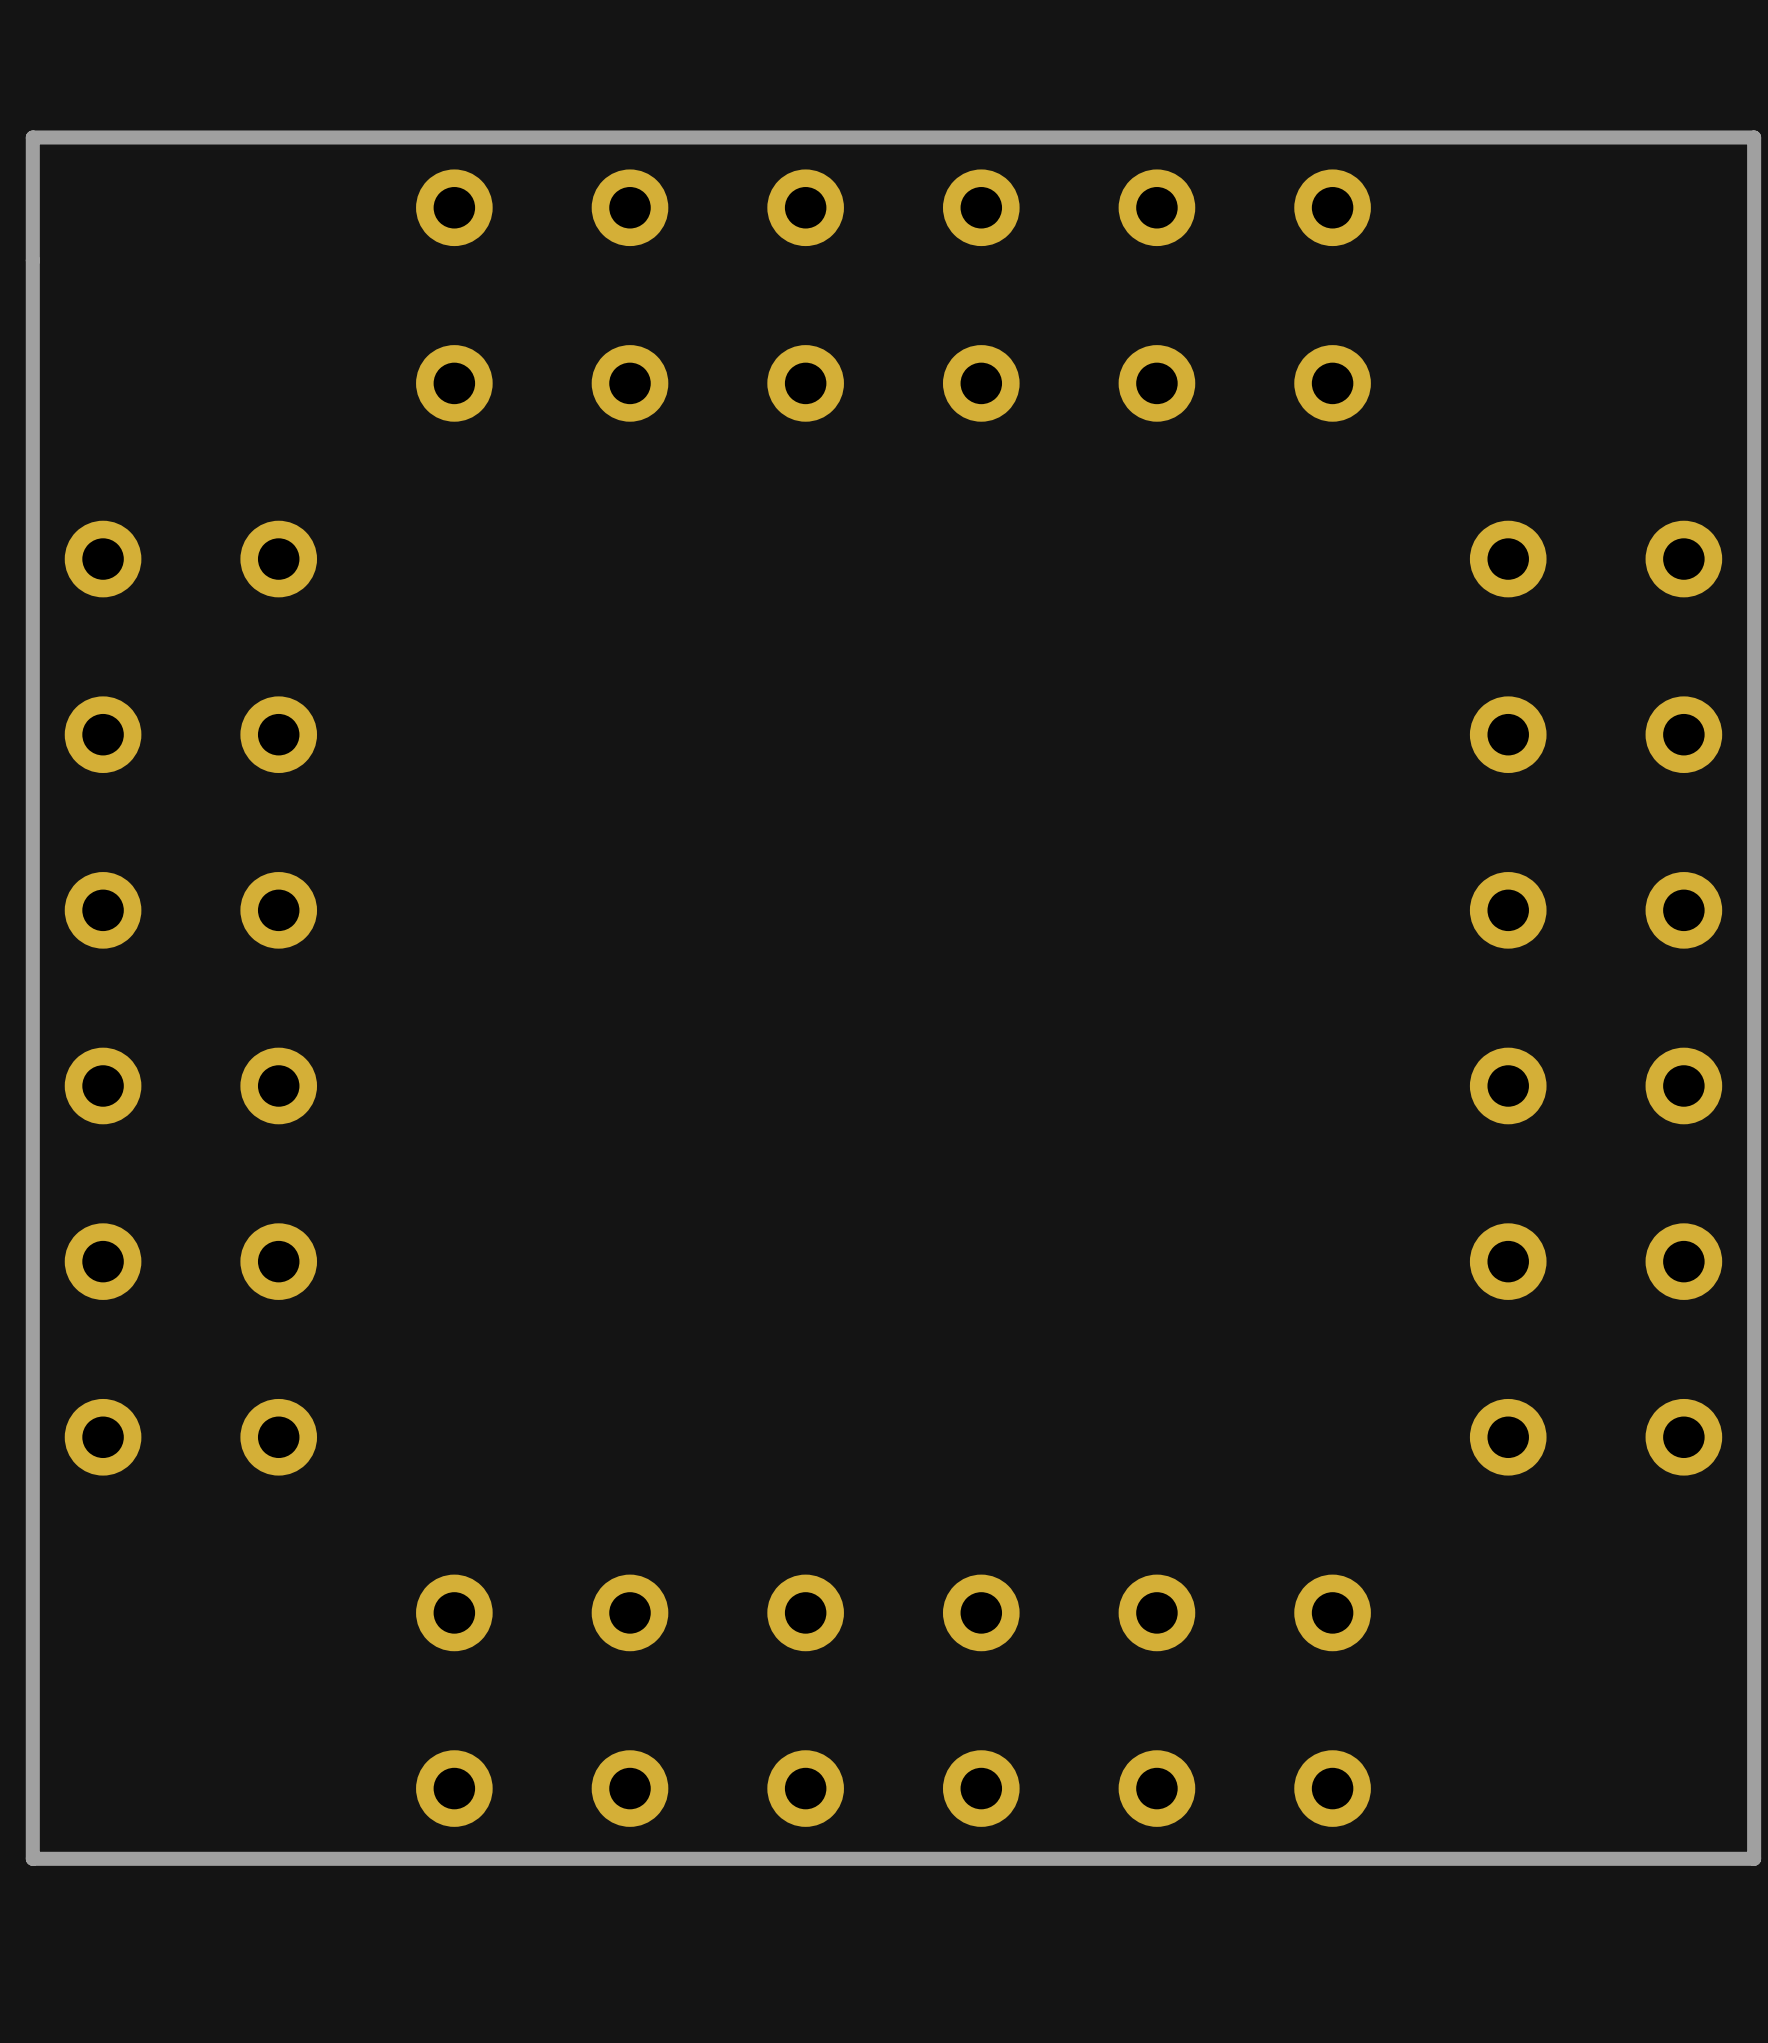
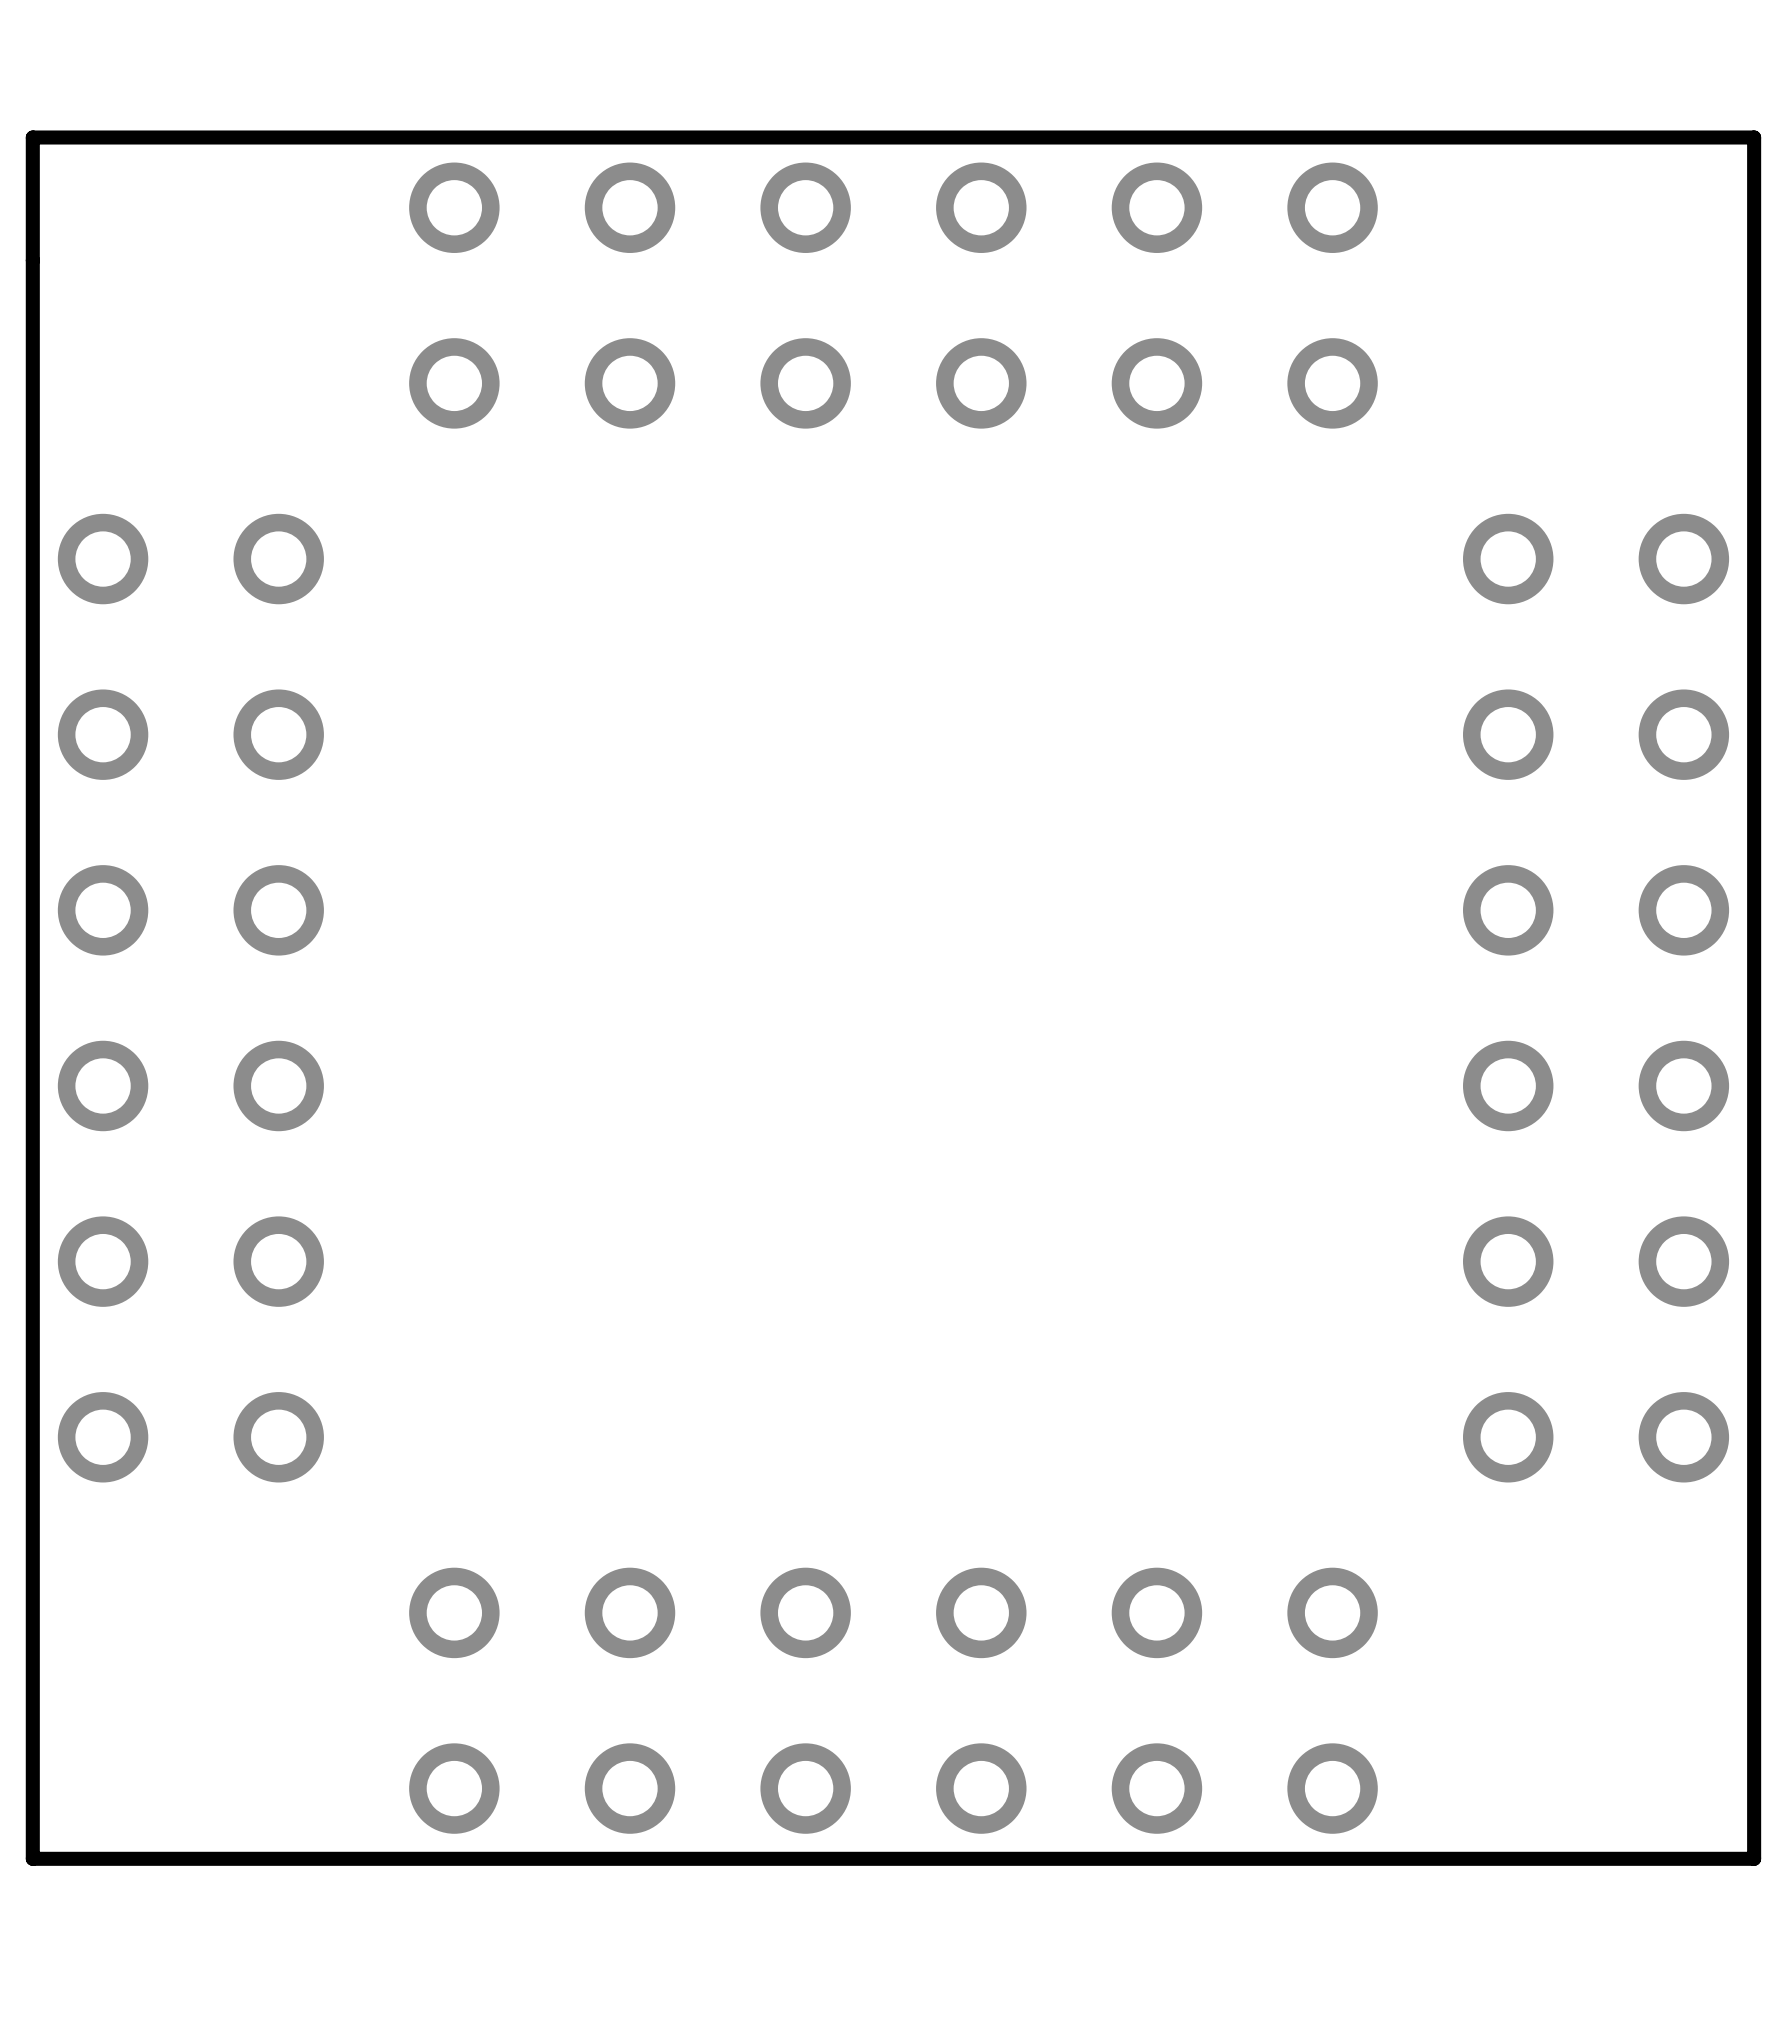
part footprint: [64, 169, 1723, 1827] -> [57, 162, 1730, 1834]

